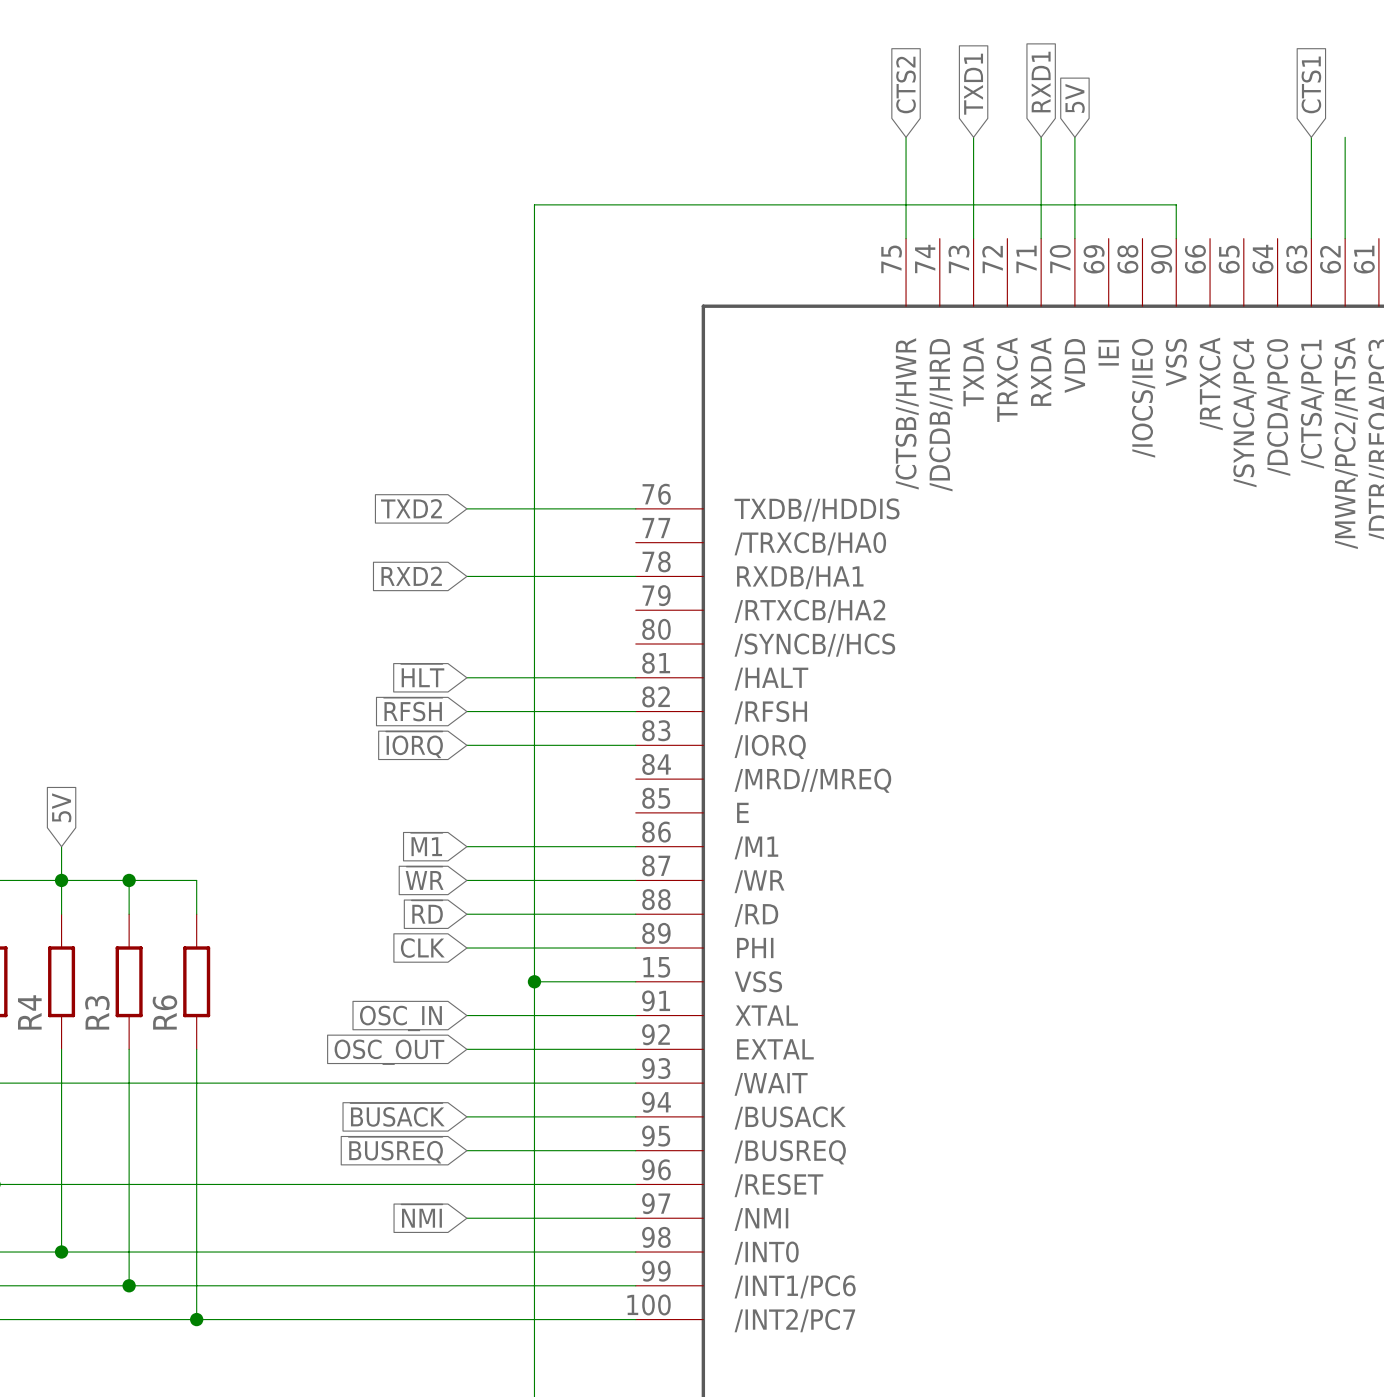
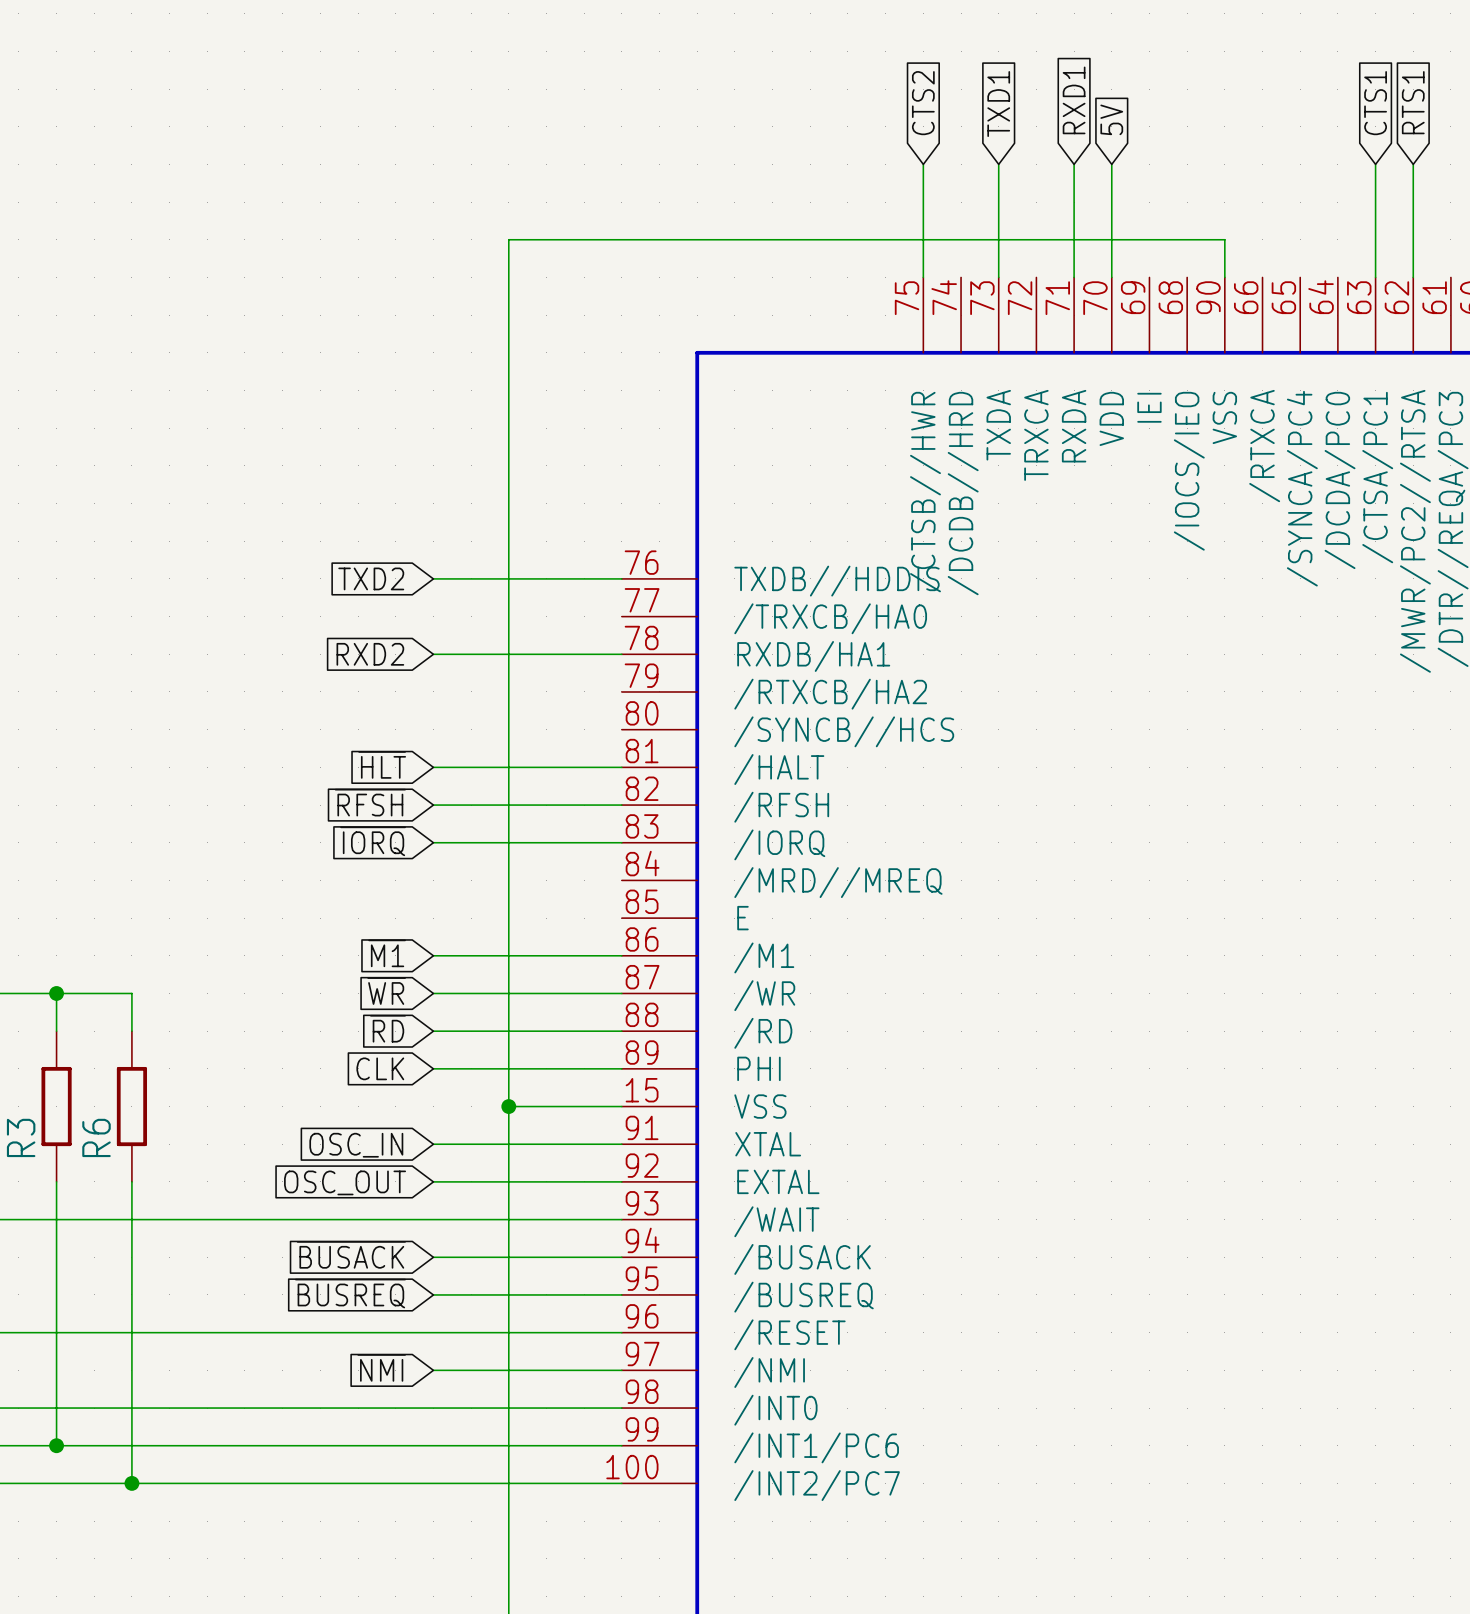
global label: none -> RTS1 (1413, 102)

